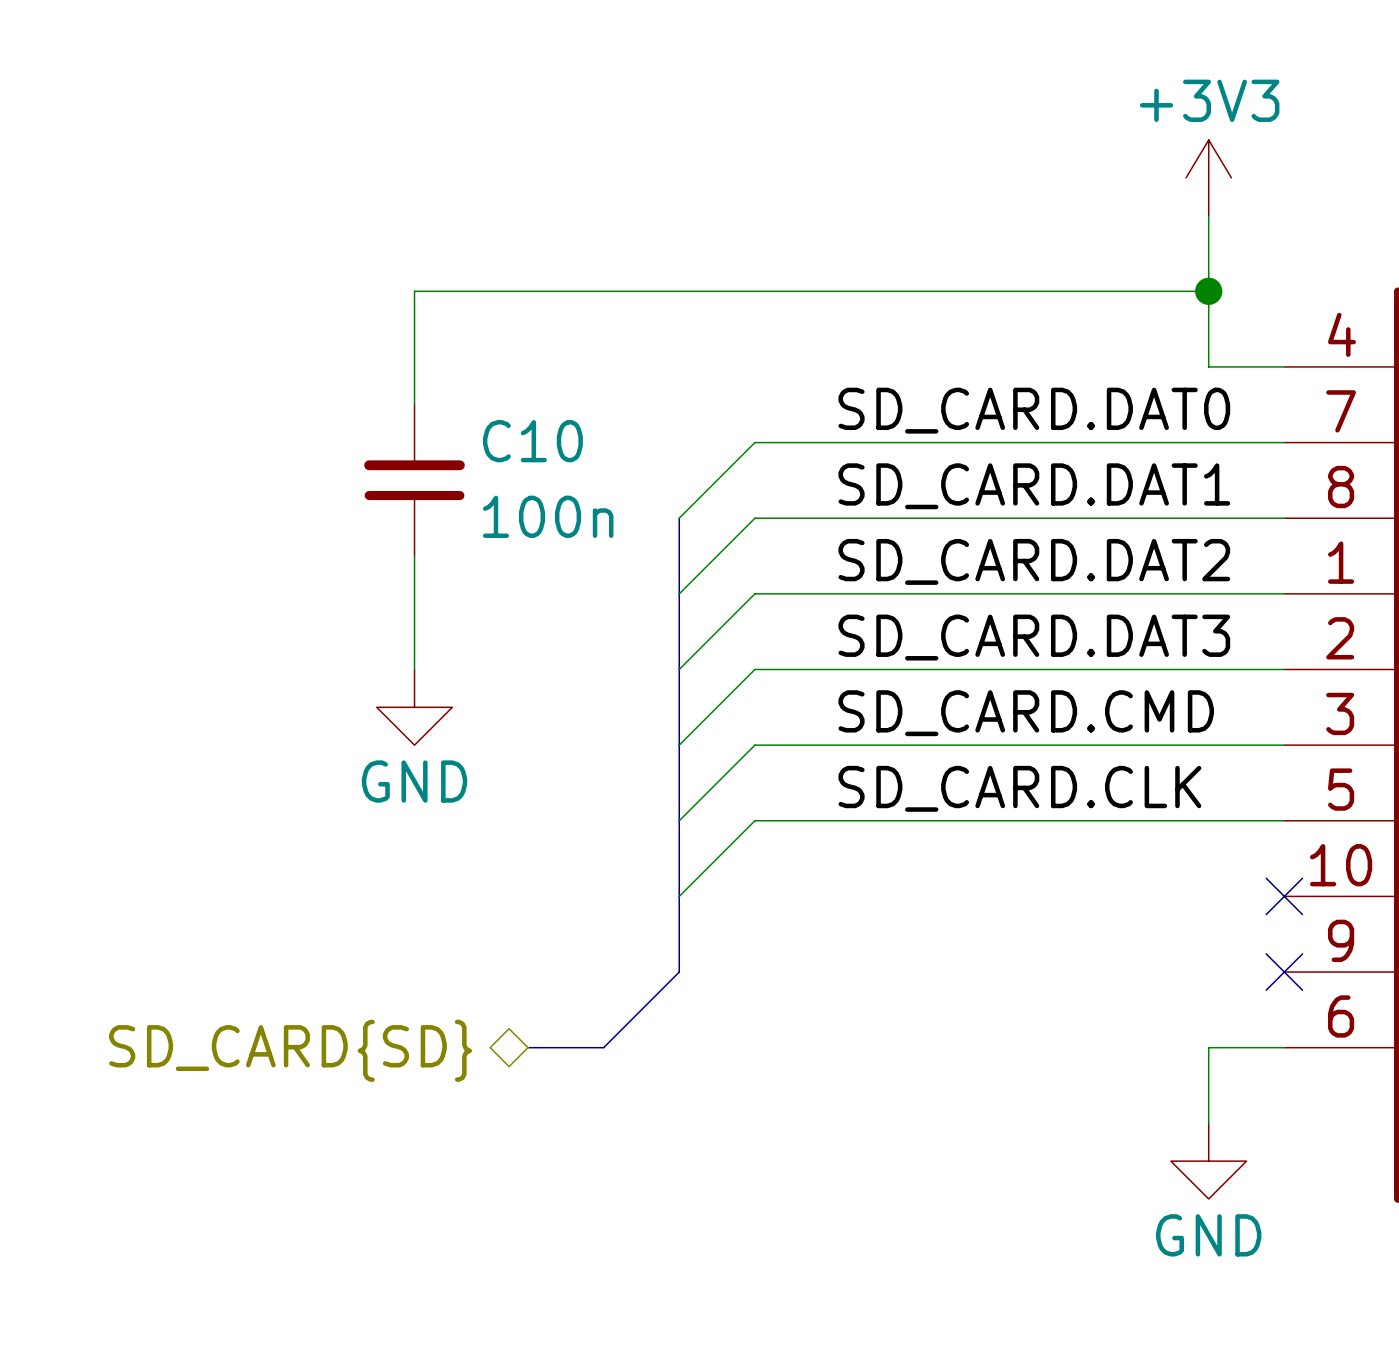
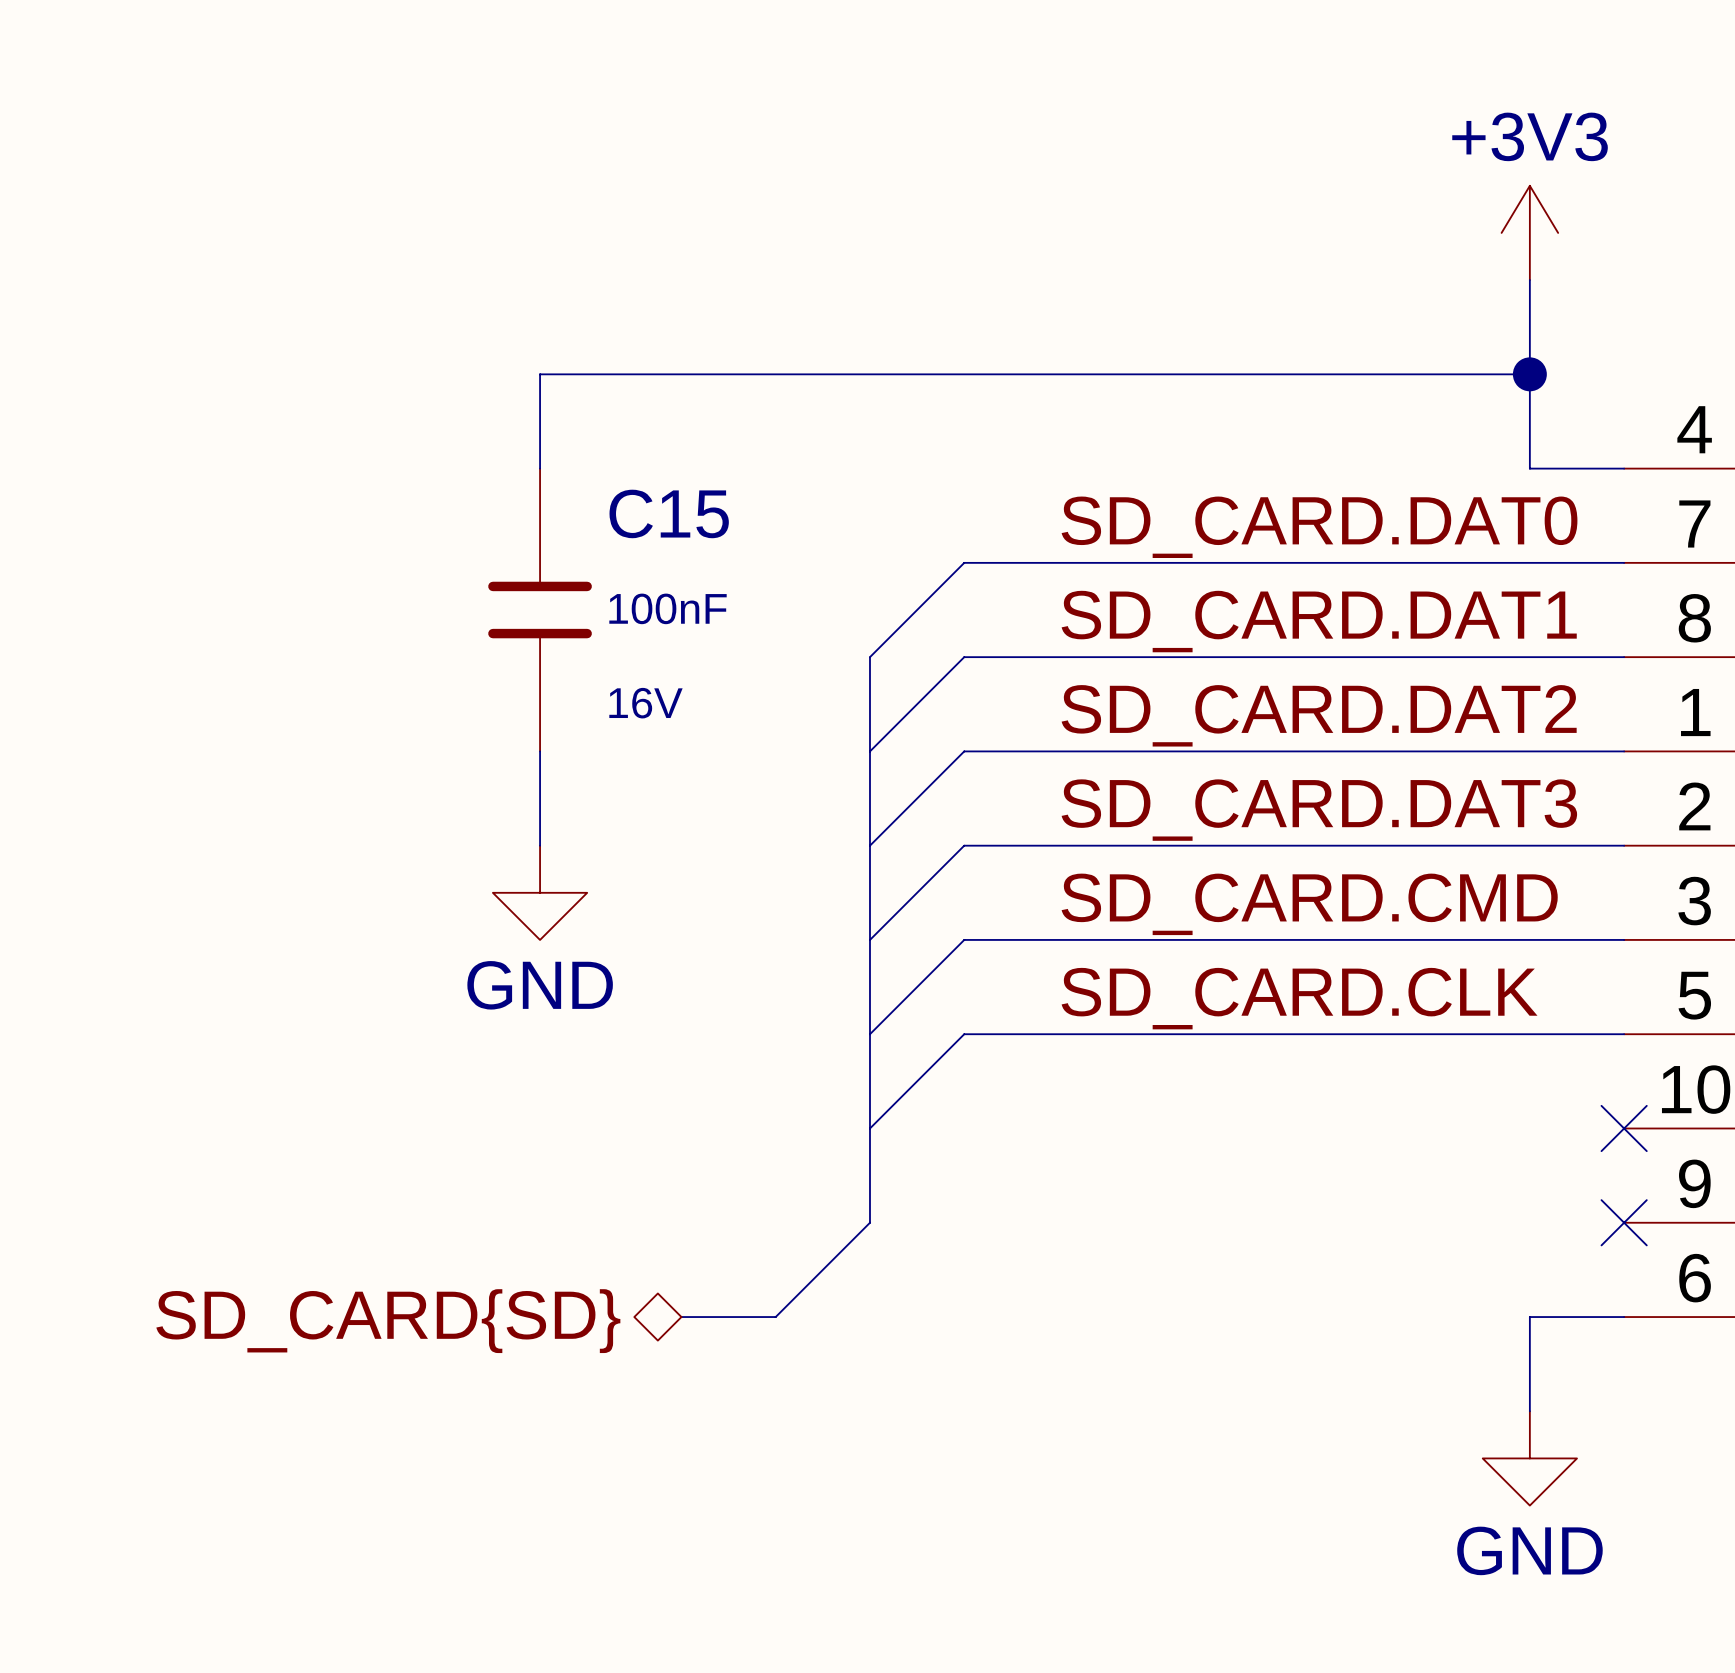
C10: (414, 480) -> none
C15: none -> 100nF (540, 610)

